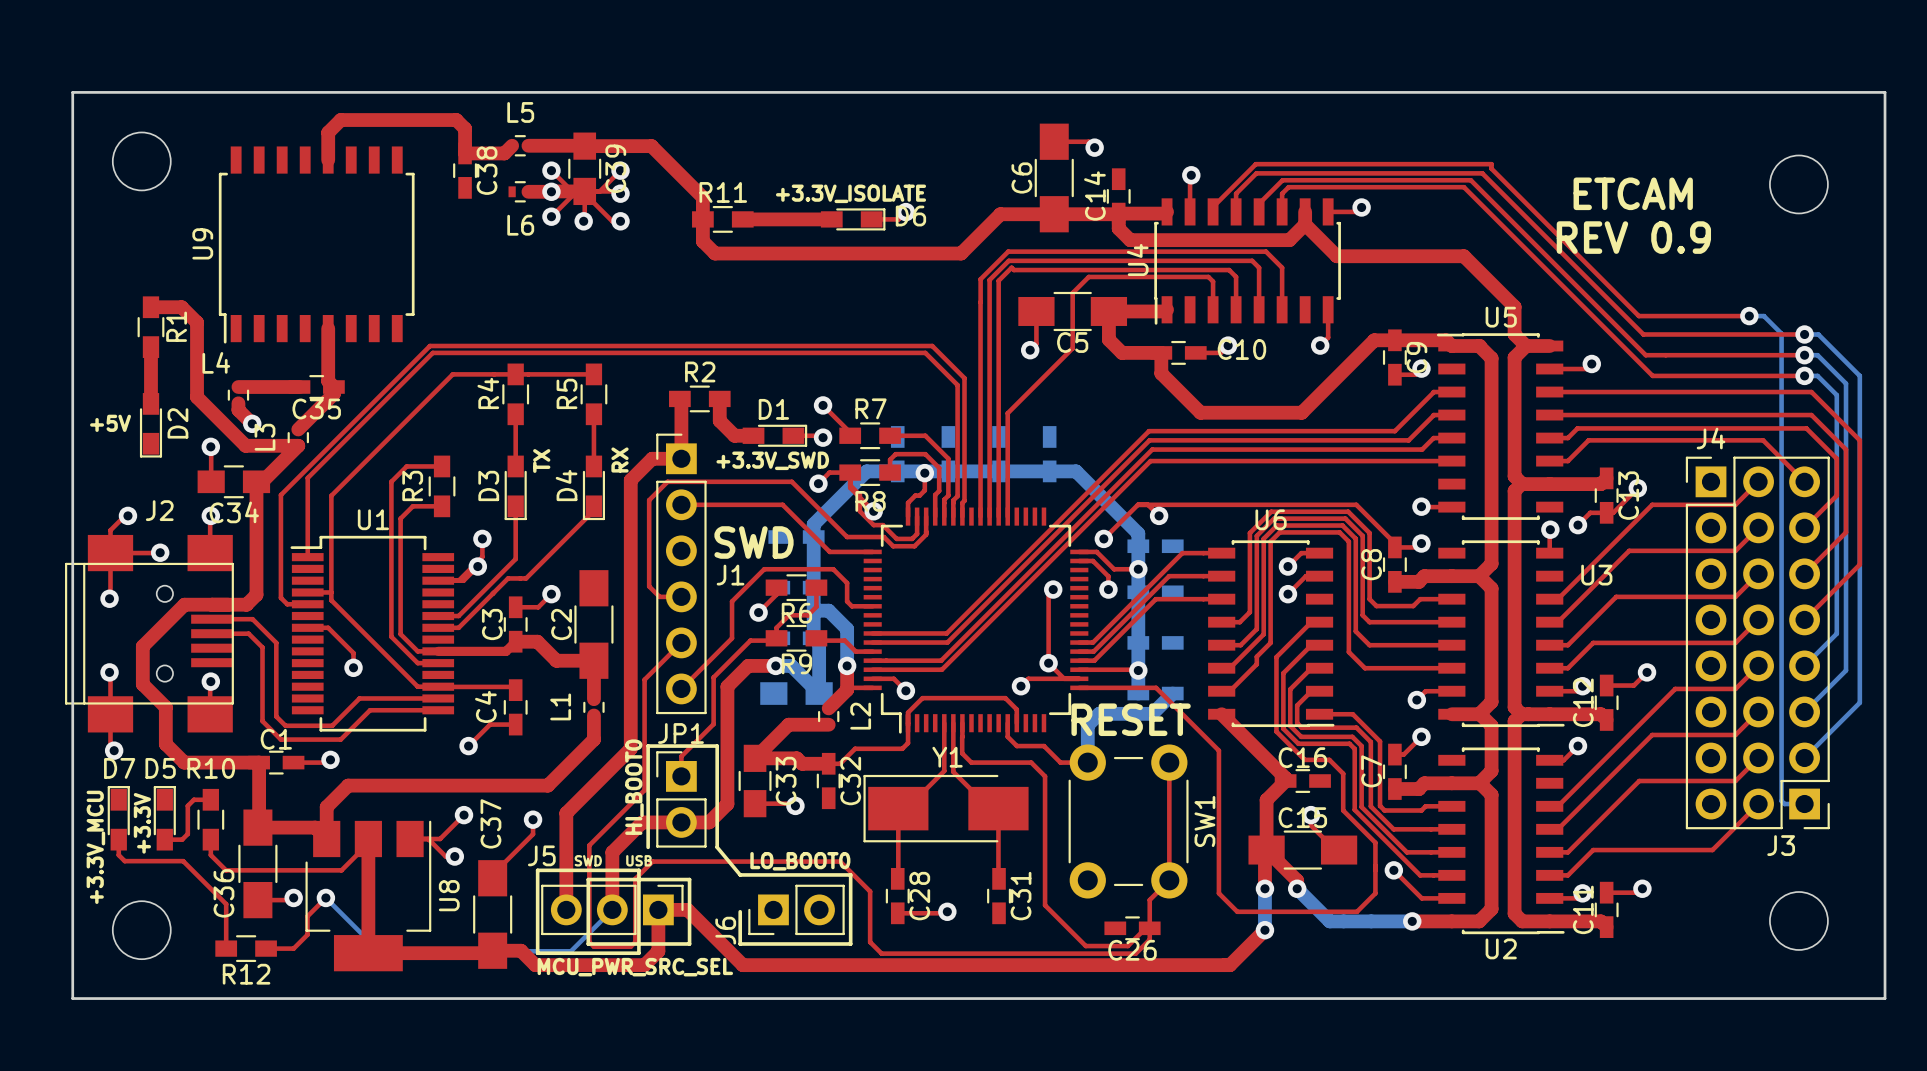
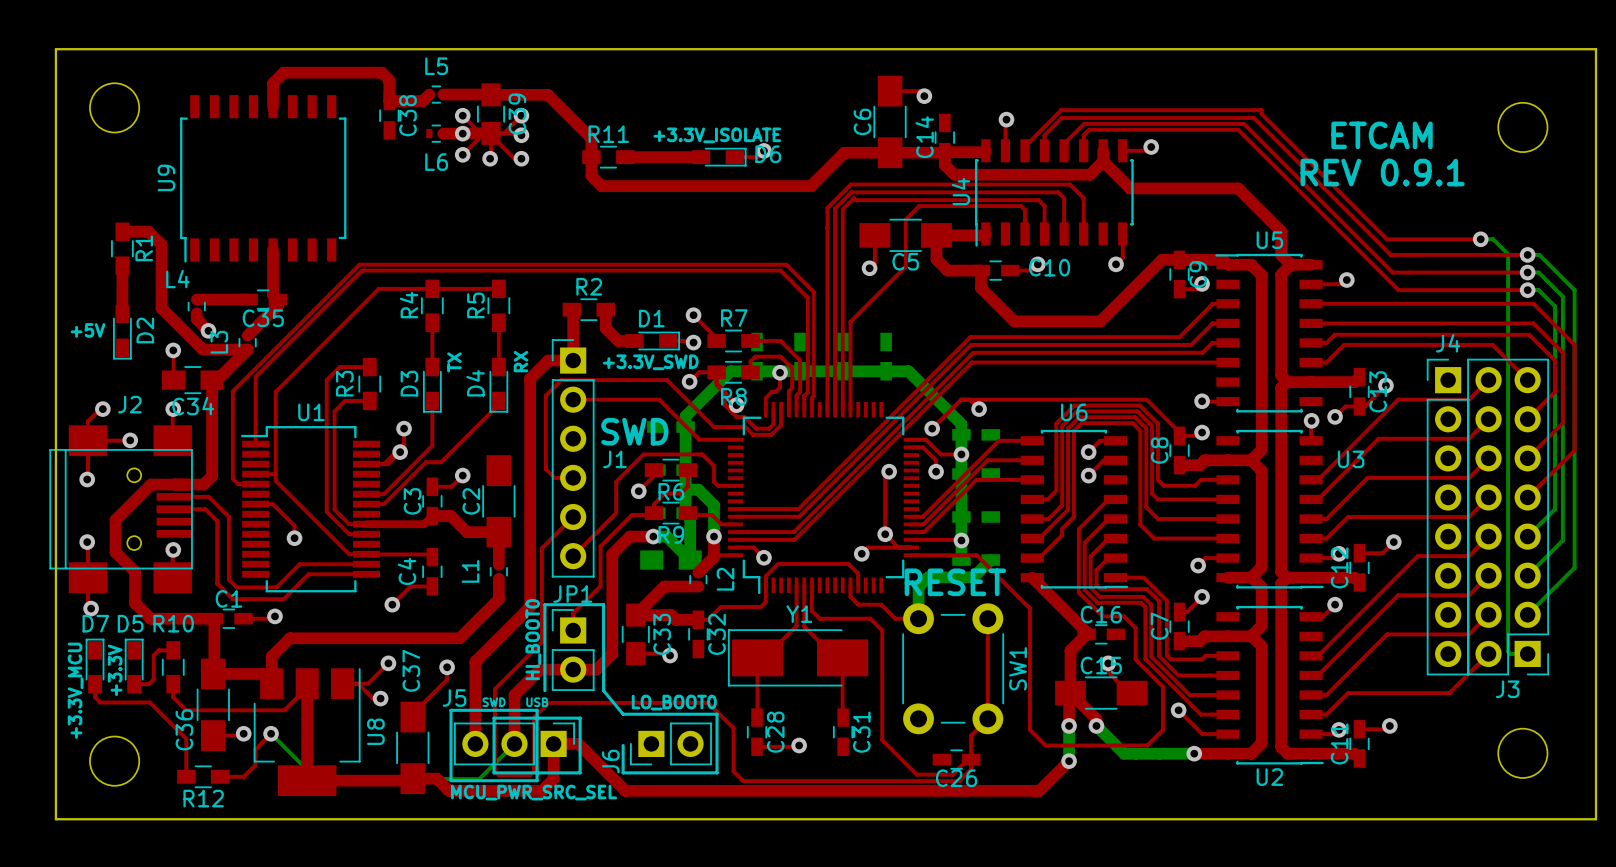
text: REV 0.9 (1633, 237) -> REV 0.9.1 (1382, 172)

